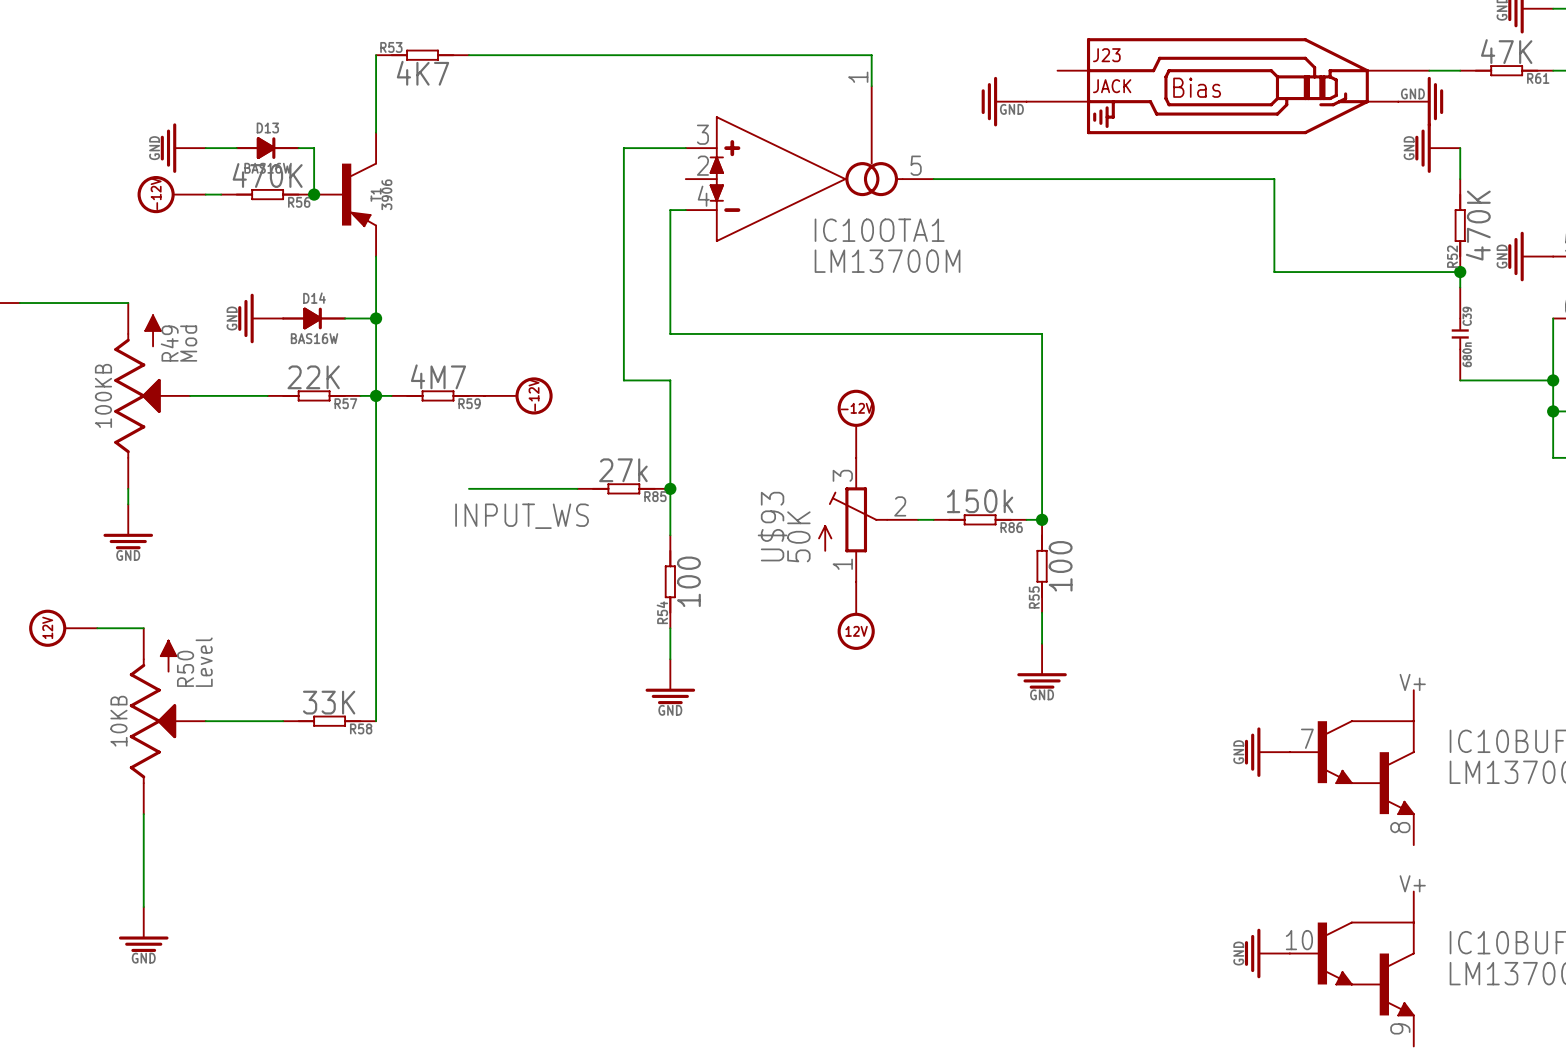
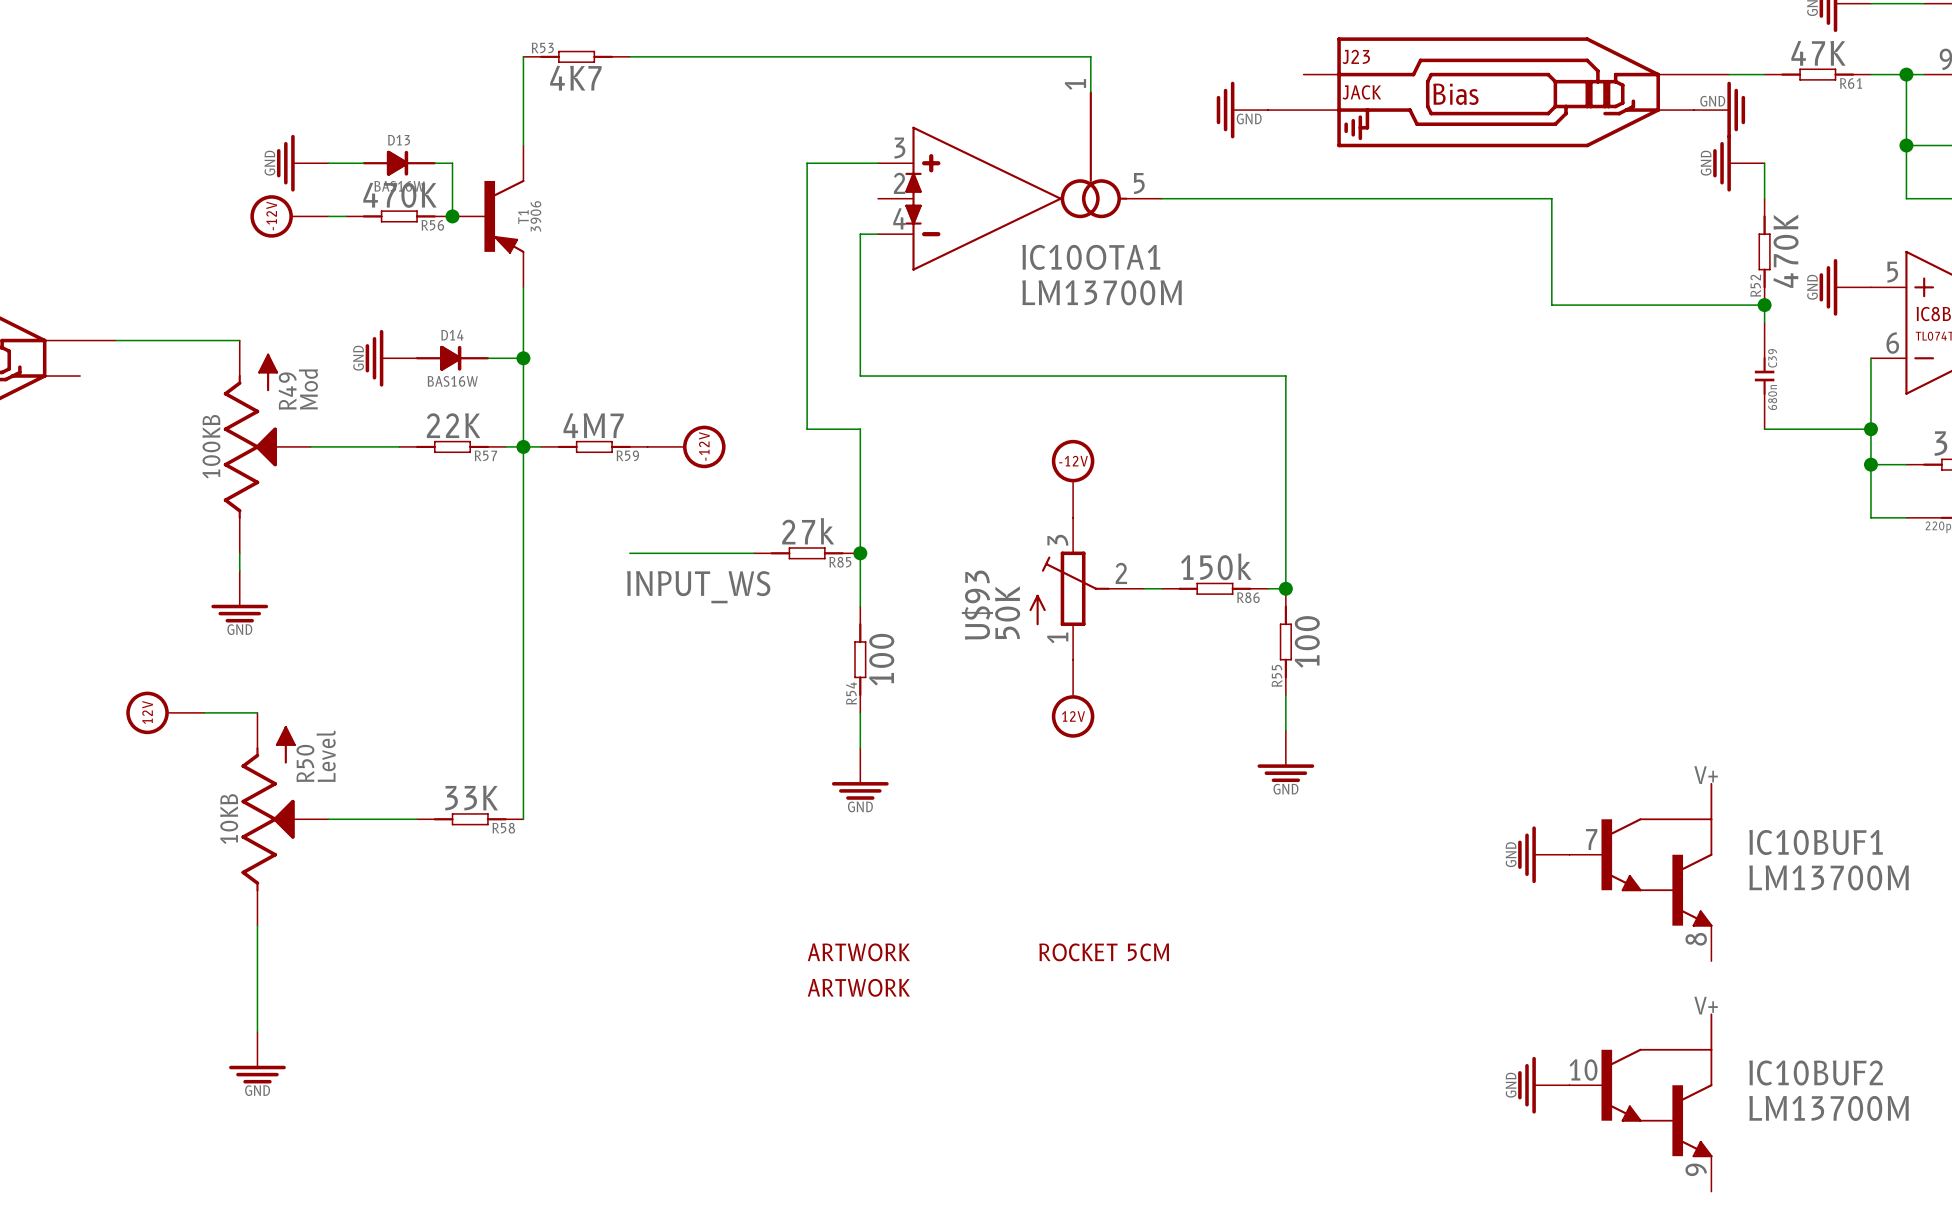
part: none -> (858, 952)
part: none -> (1104, 952)
part: none -> (858, 987)

